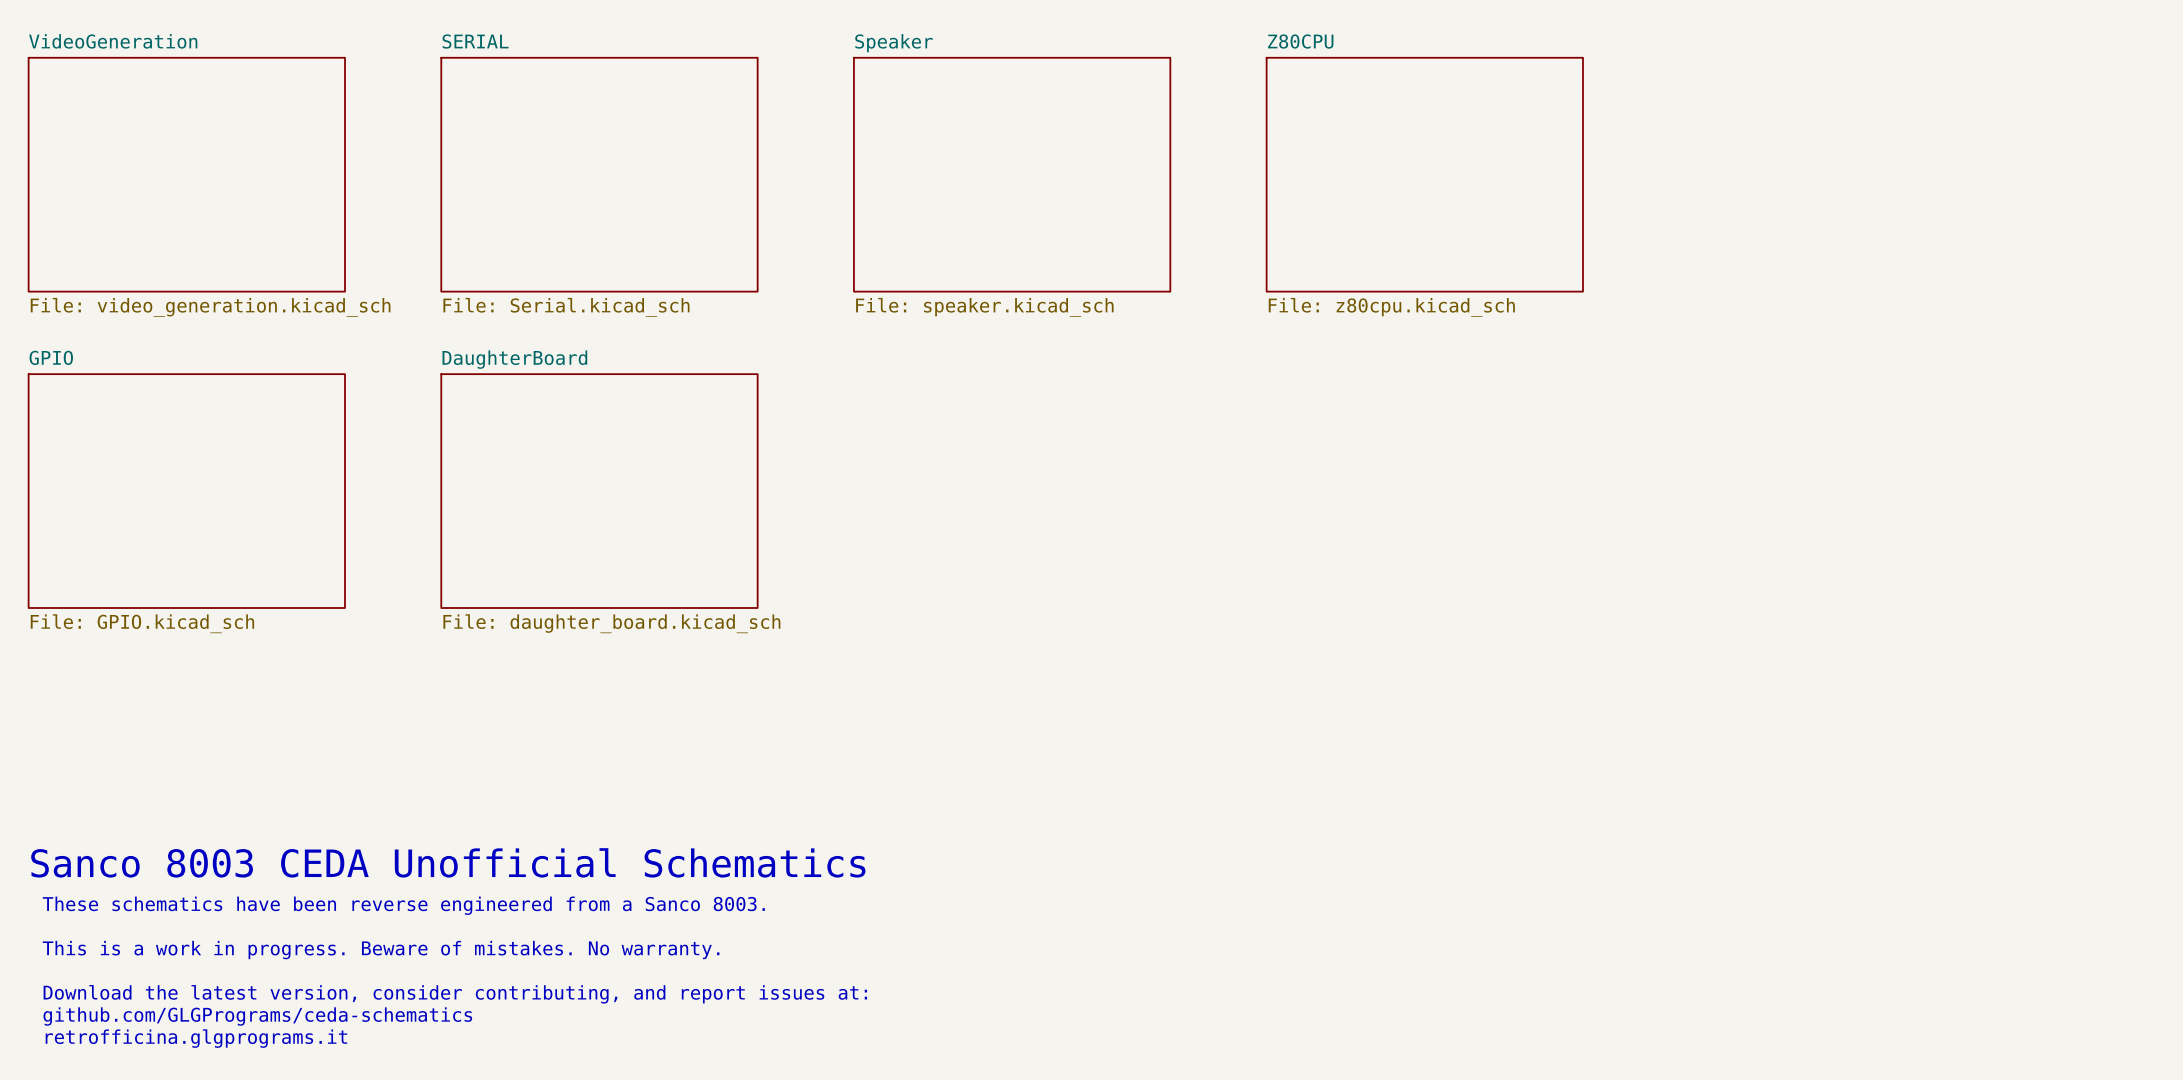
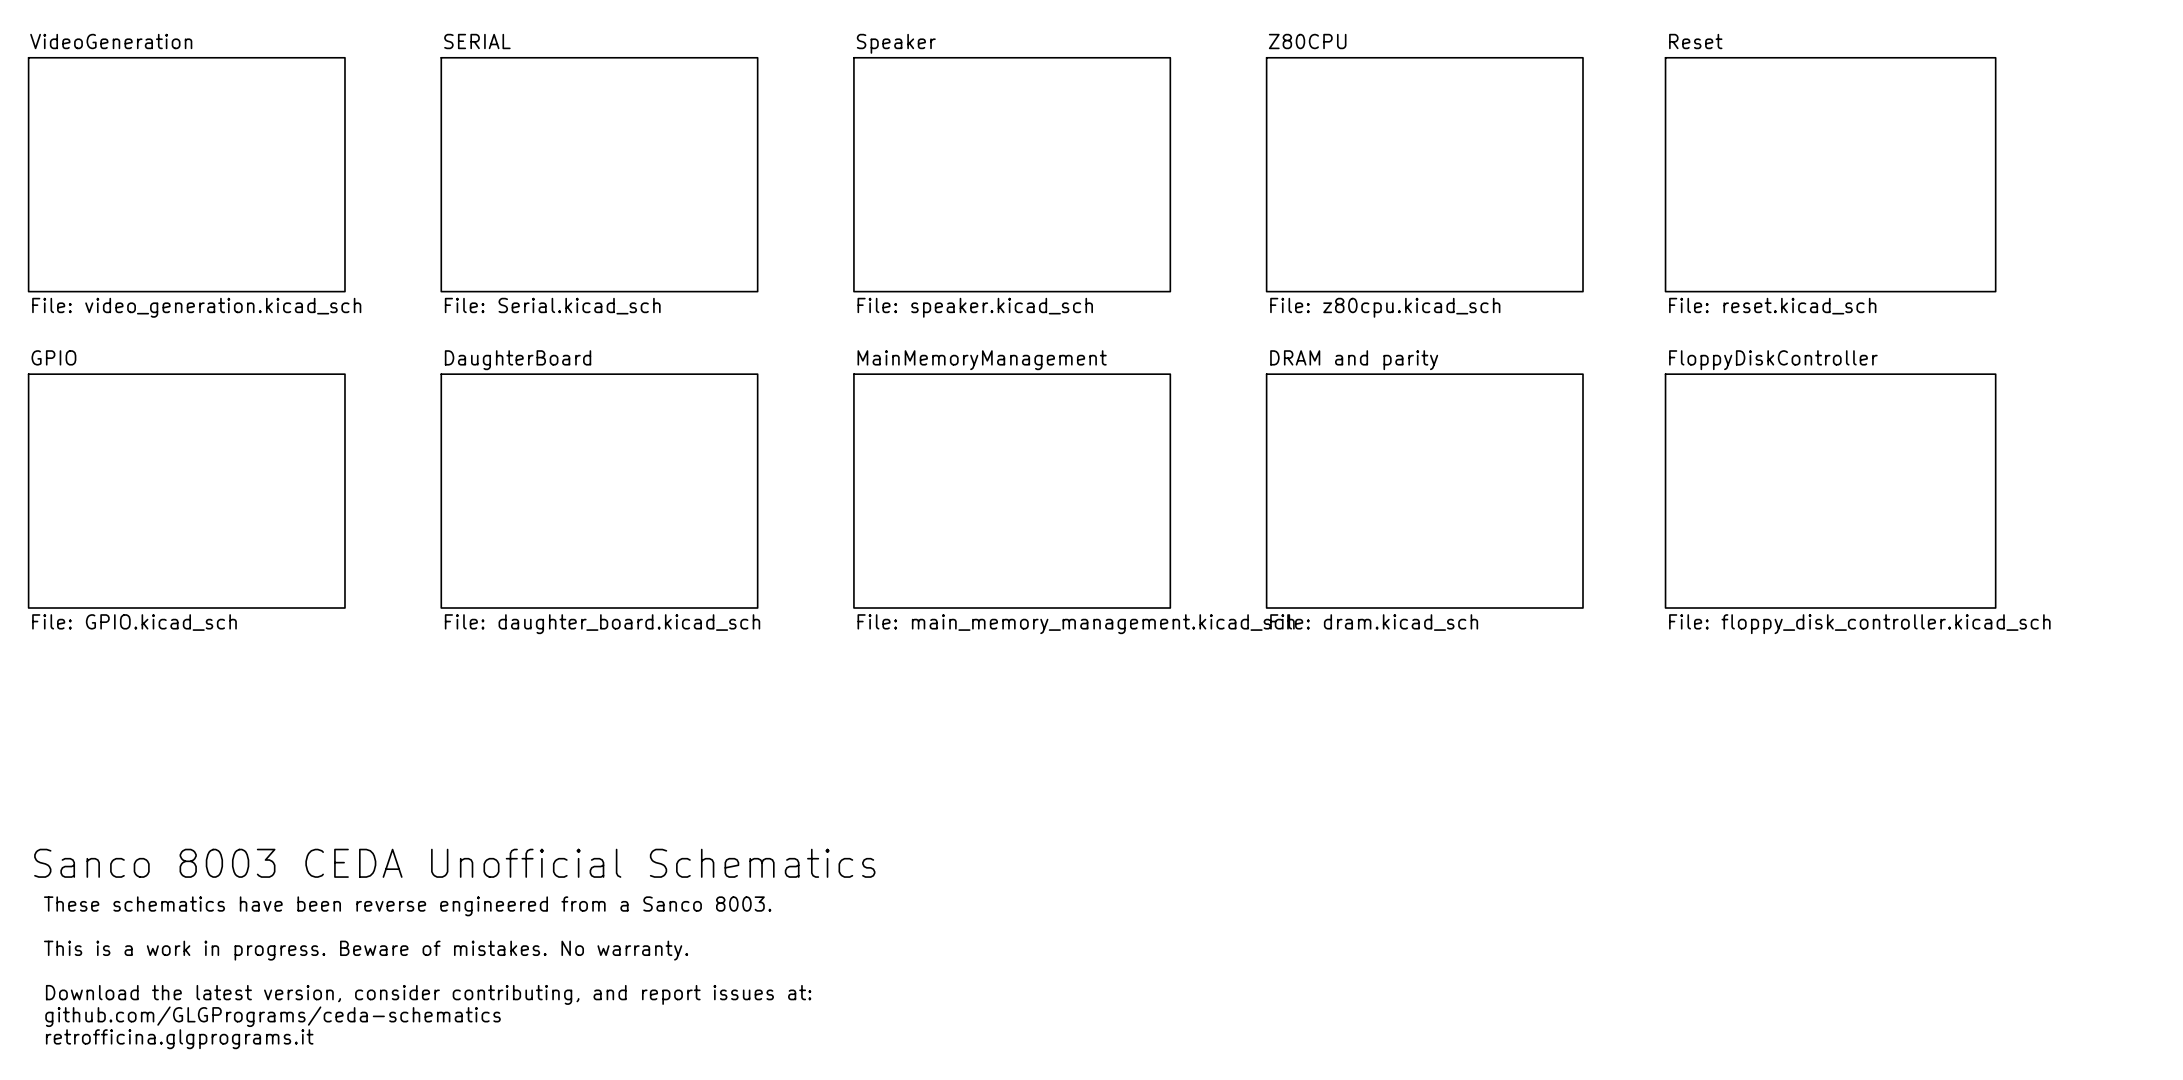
sheet Reset: none -> File: reset.kicad_sch (1830, 174)
sheet MainMemoryManagement: none -> File: main_memory_management.kicad_sch (1012, 491)
sheet DRAM and parity: none -> File: dram.kicad_sch (1424, 491)
sheet FloppyDiskController: none -> File: floppy_disk_controller.kicad_sch (1830, 491)

